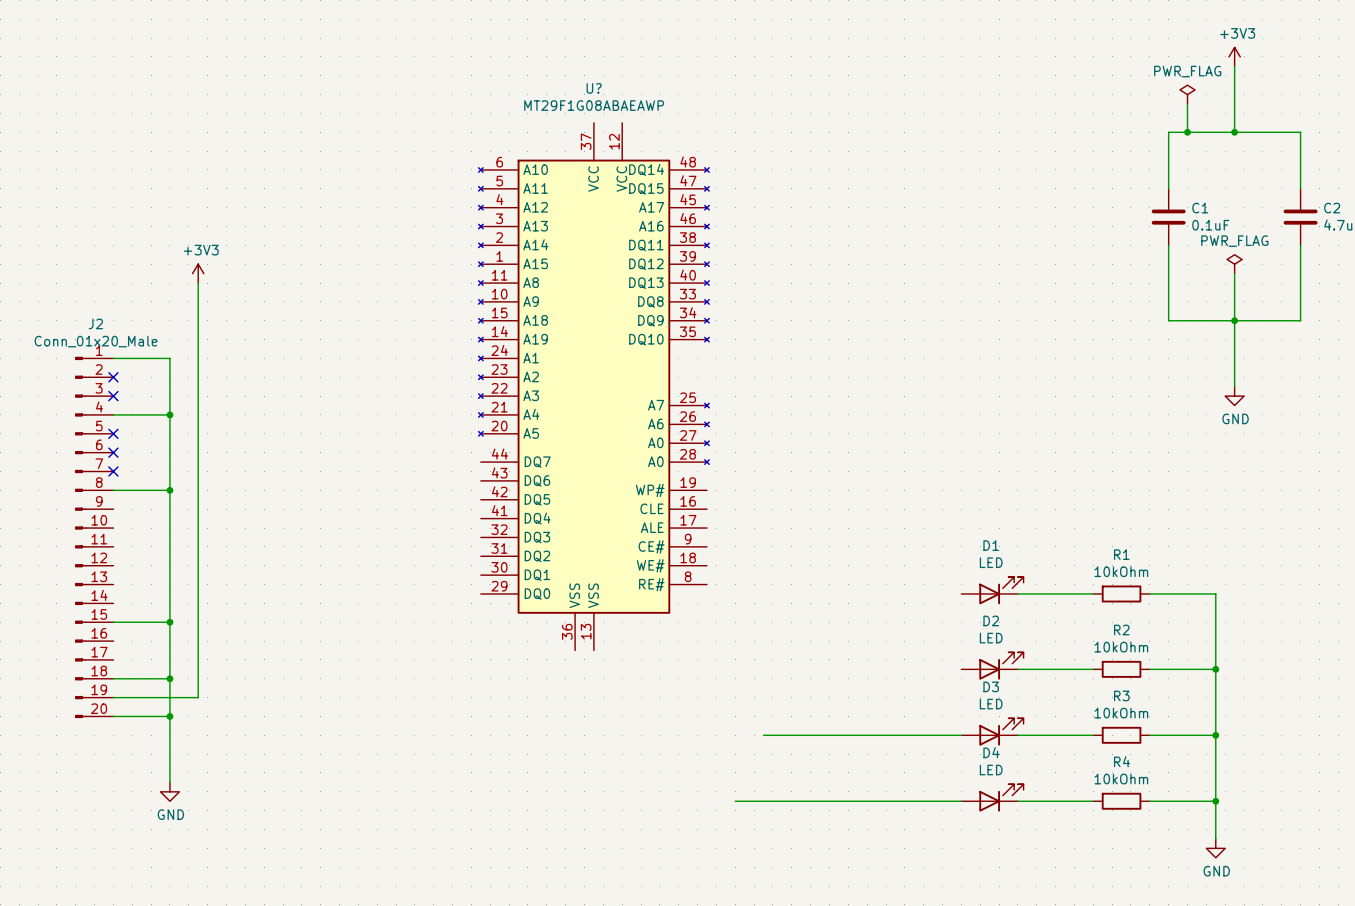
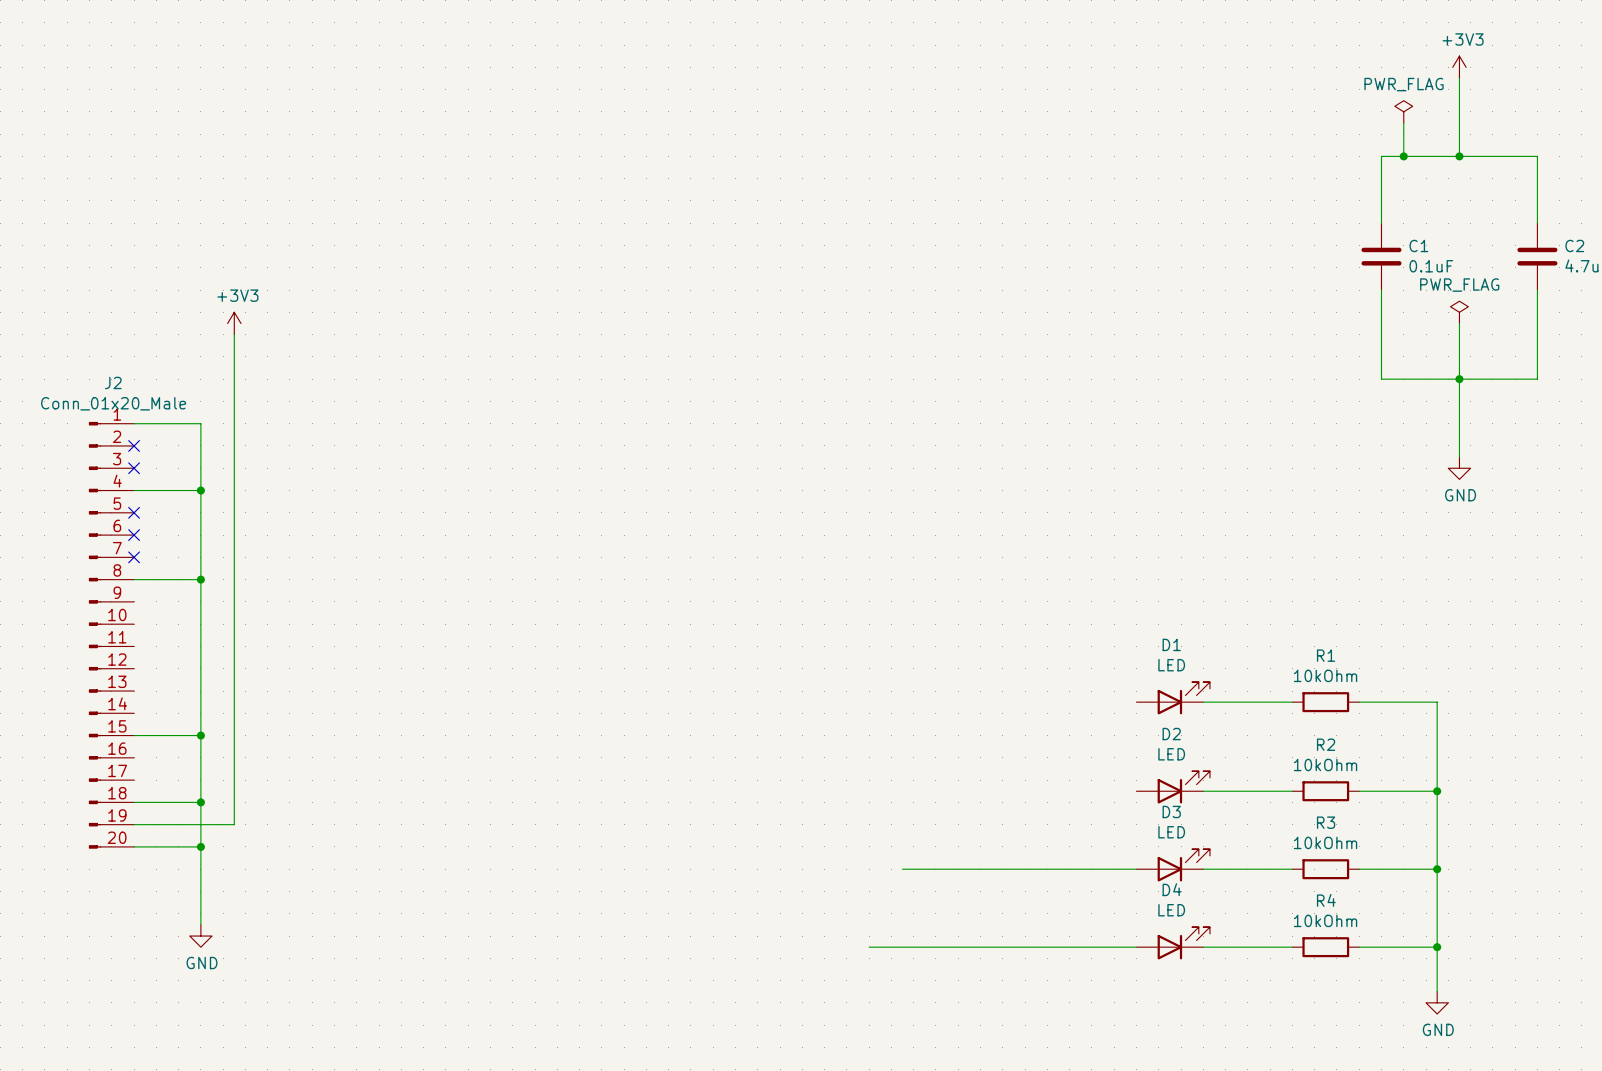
U?: MT29F1G08ABAEAWP (593, 386) -> none

